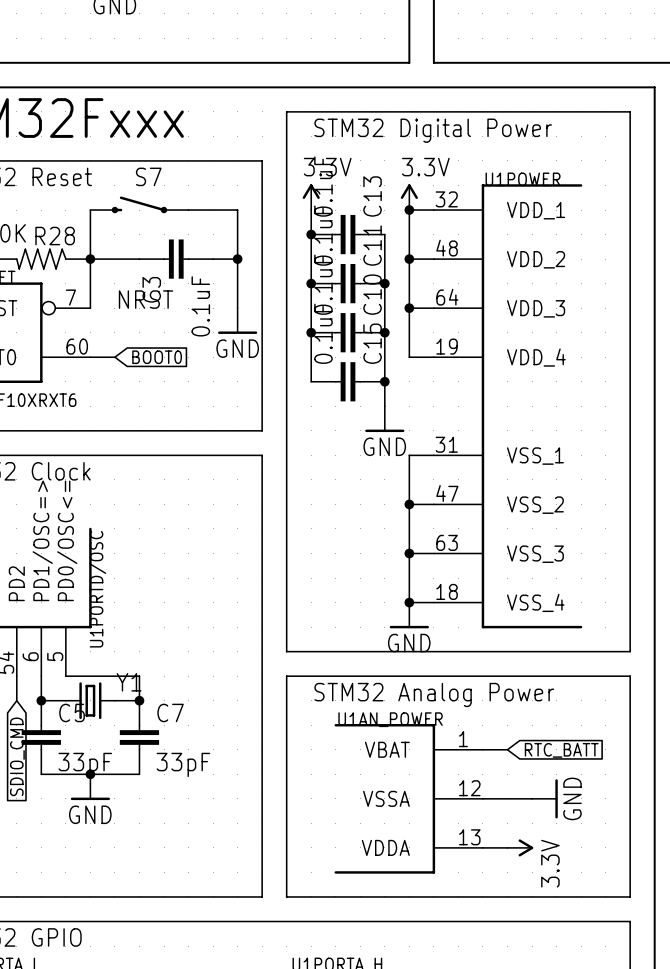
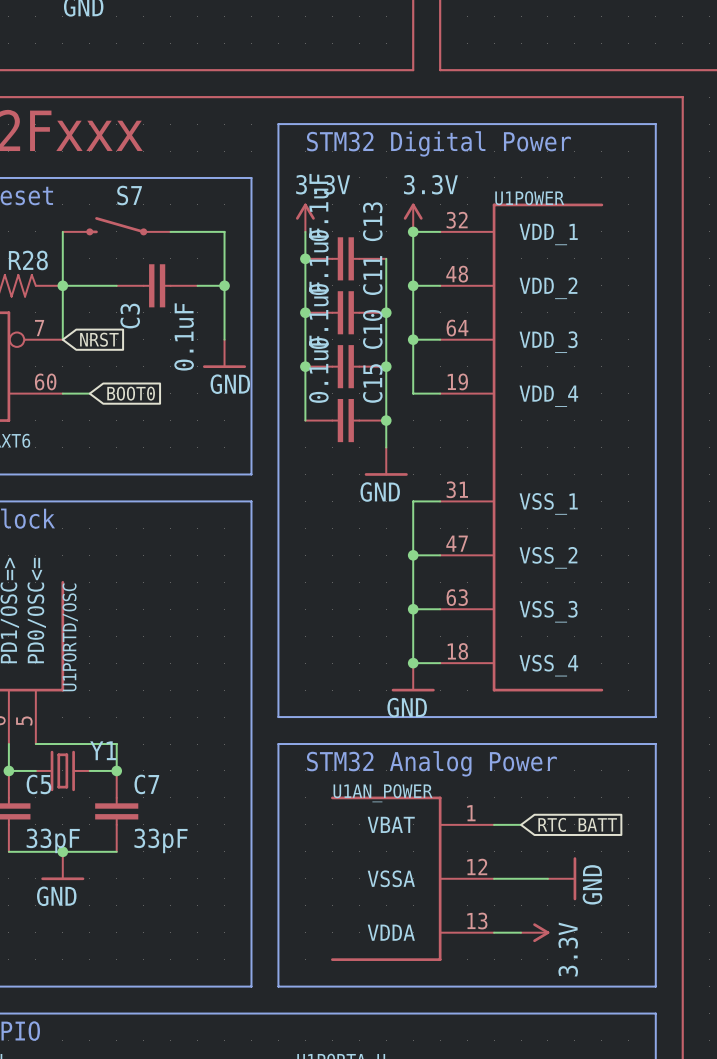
label: NRST (146, 299) -> none
global label: none -> NRST (99, 339)

